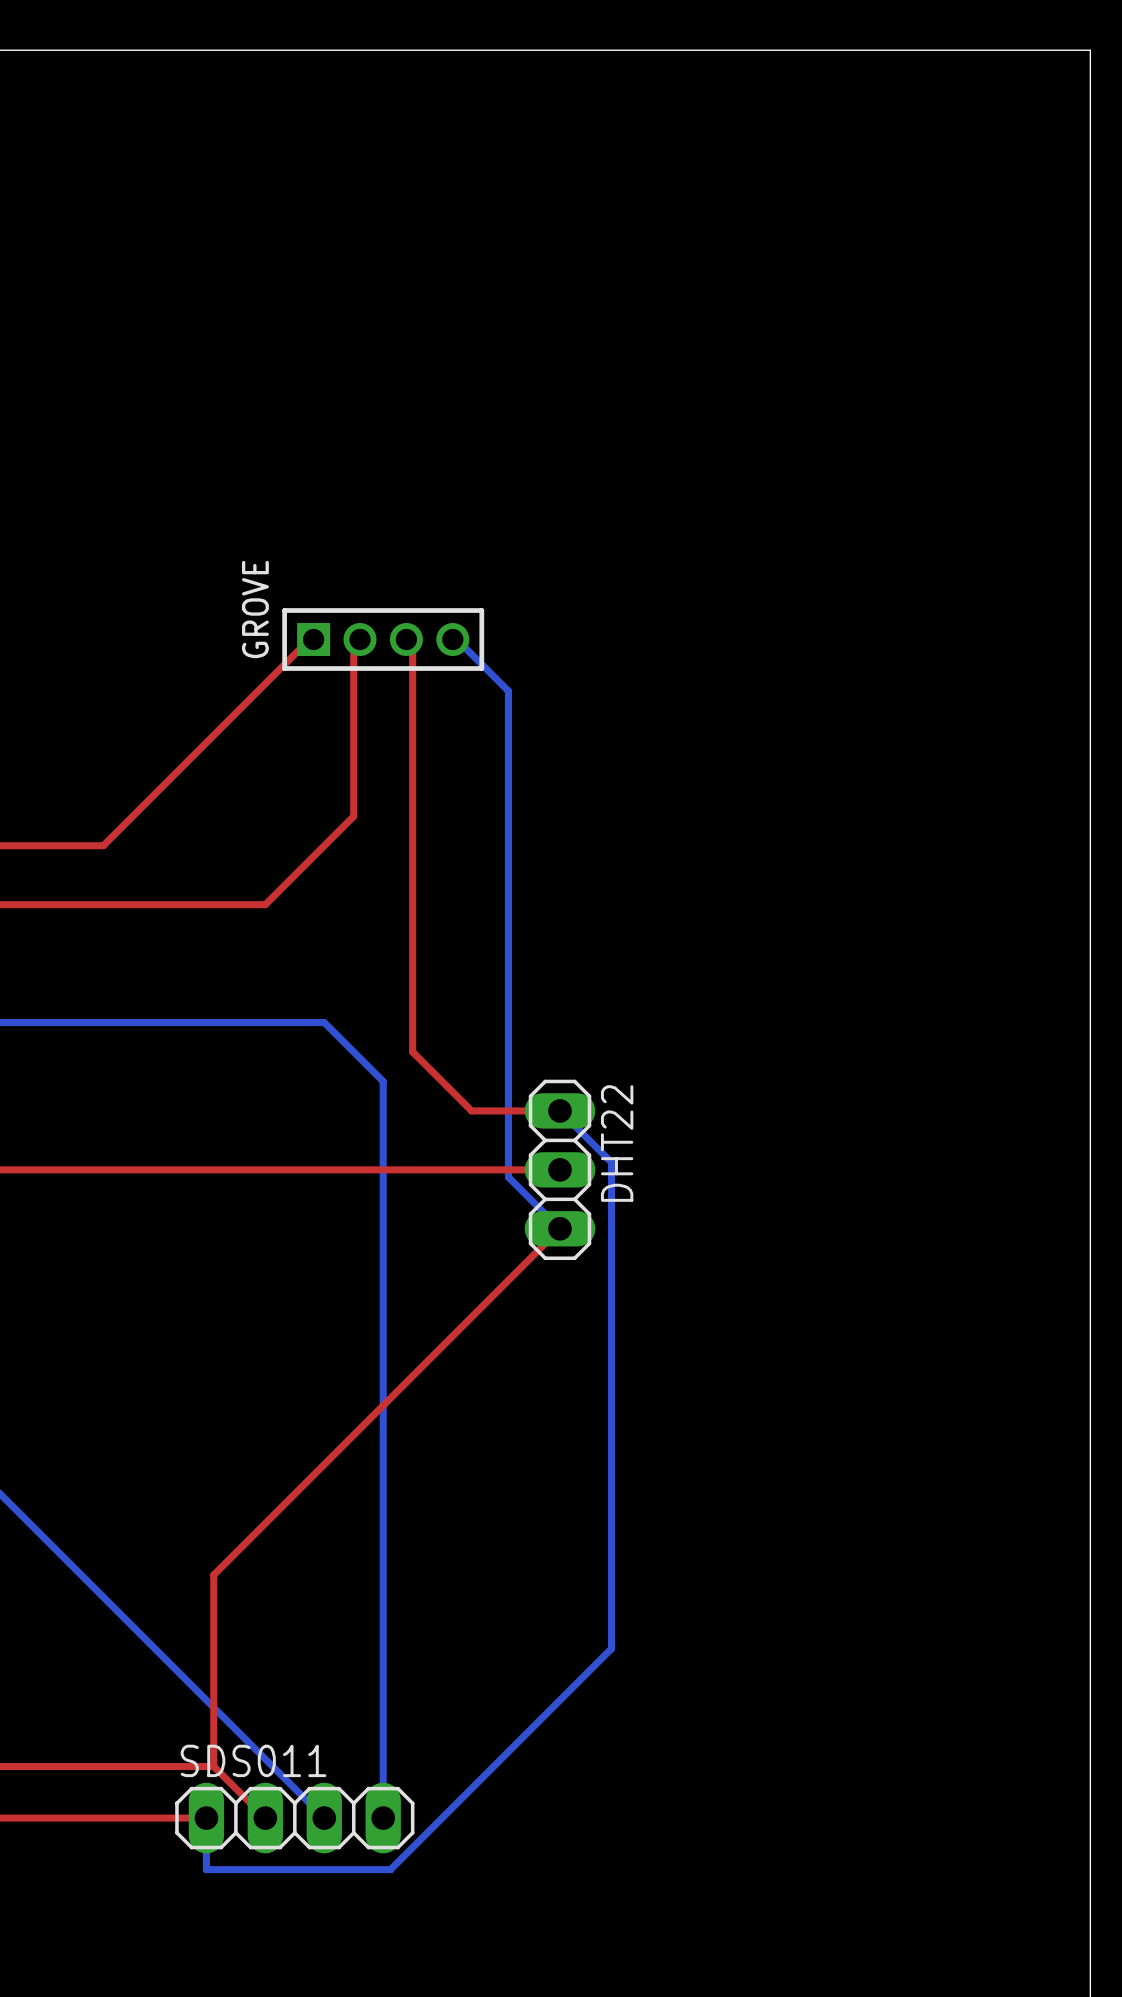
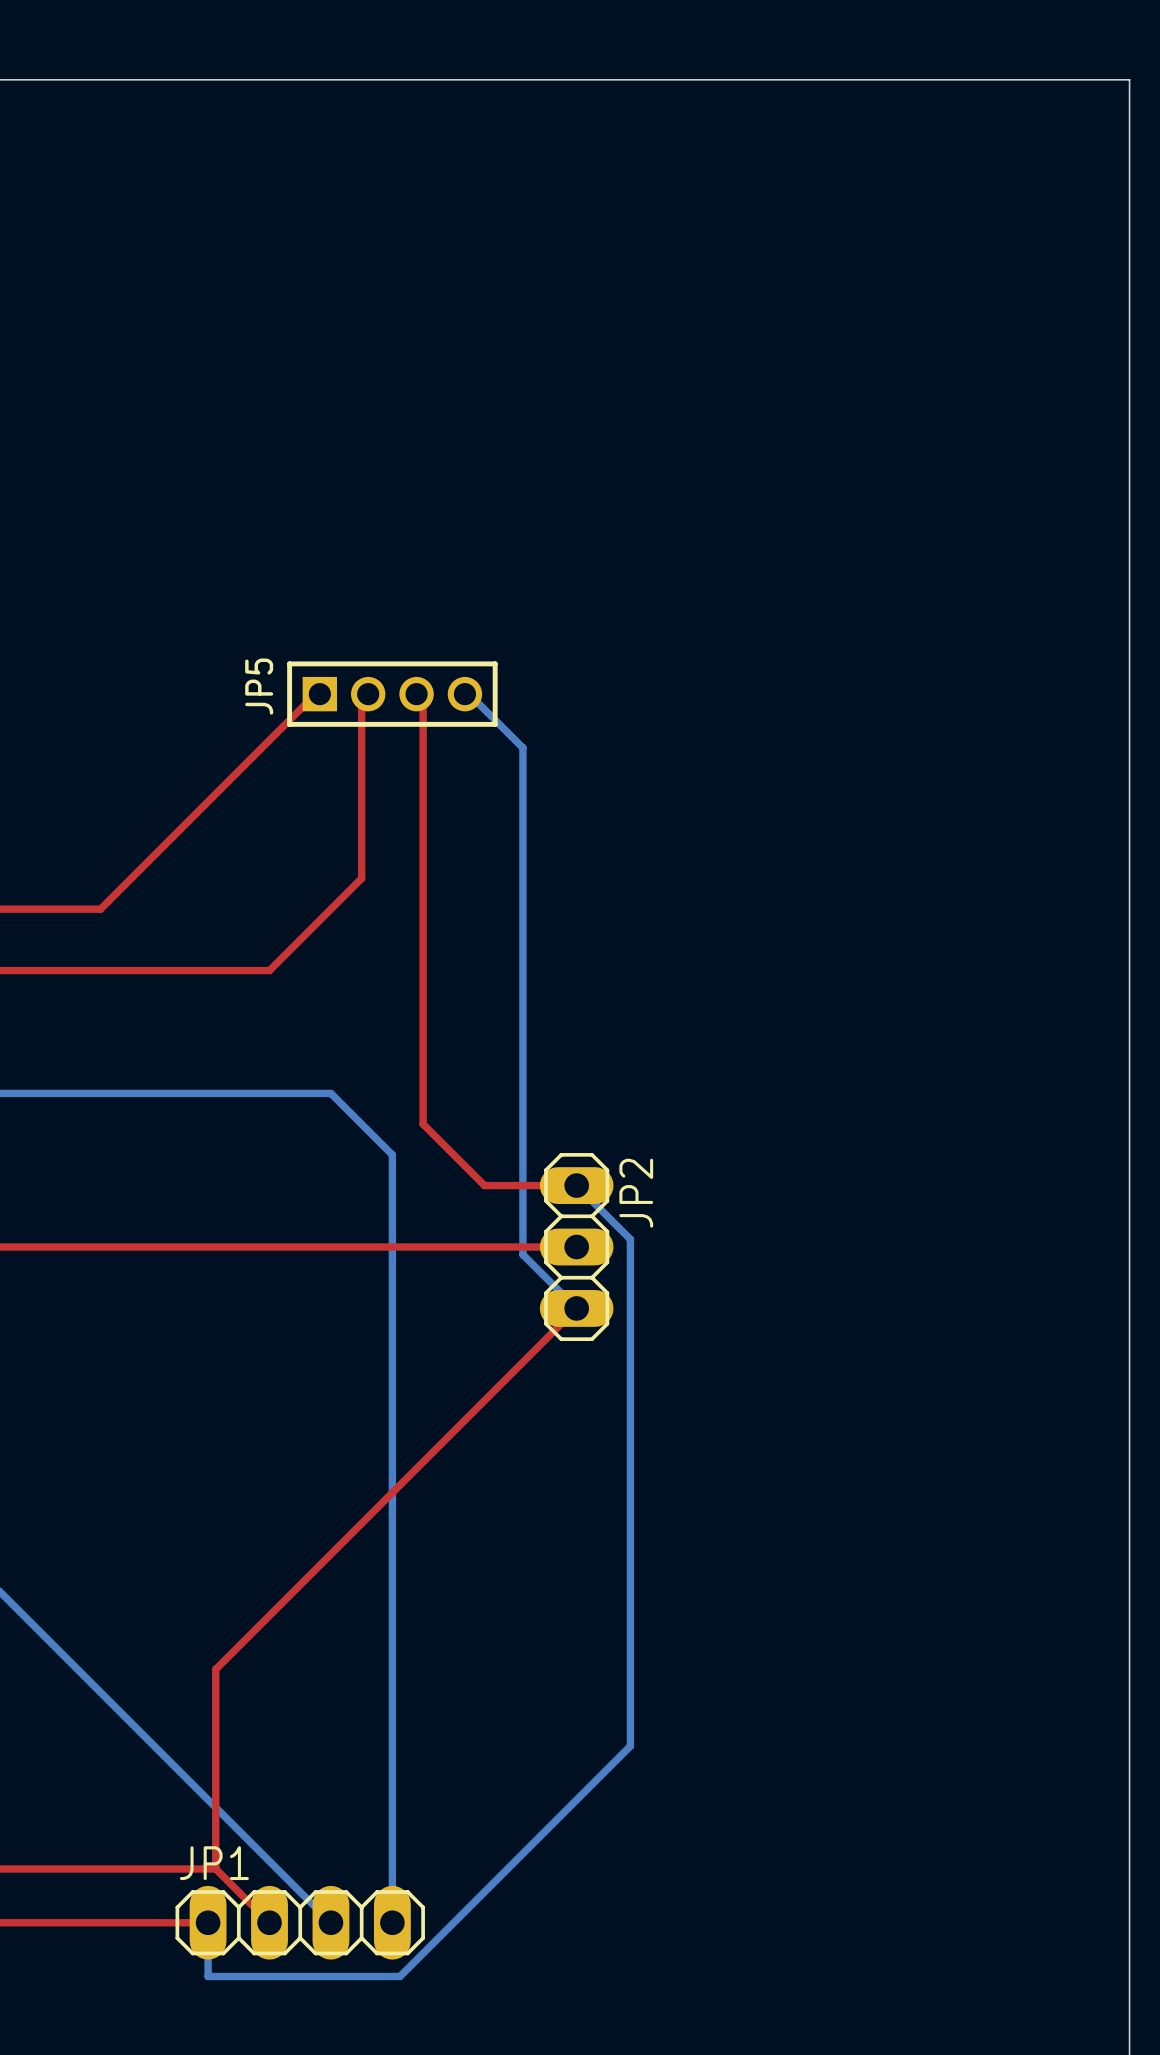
GROVE name: GROVE (255, 609) -> JP5 (259, 686)
DHT22 name: DHT22 (617, 1143) -> JP2 (636, 1193)
SDS011 name: SDS011 (253, 1760) -> JP1 (214, 1863)

